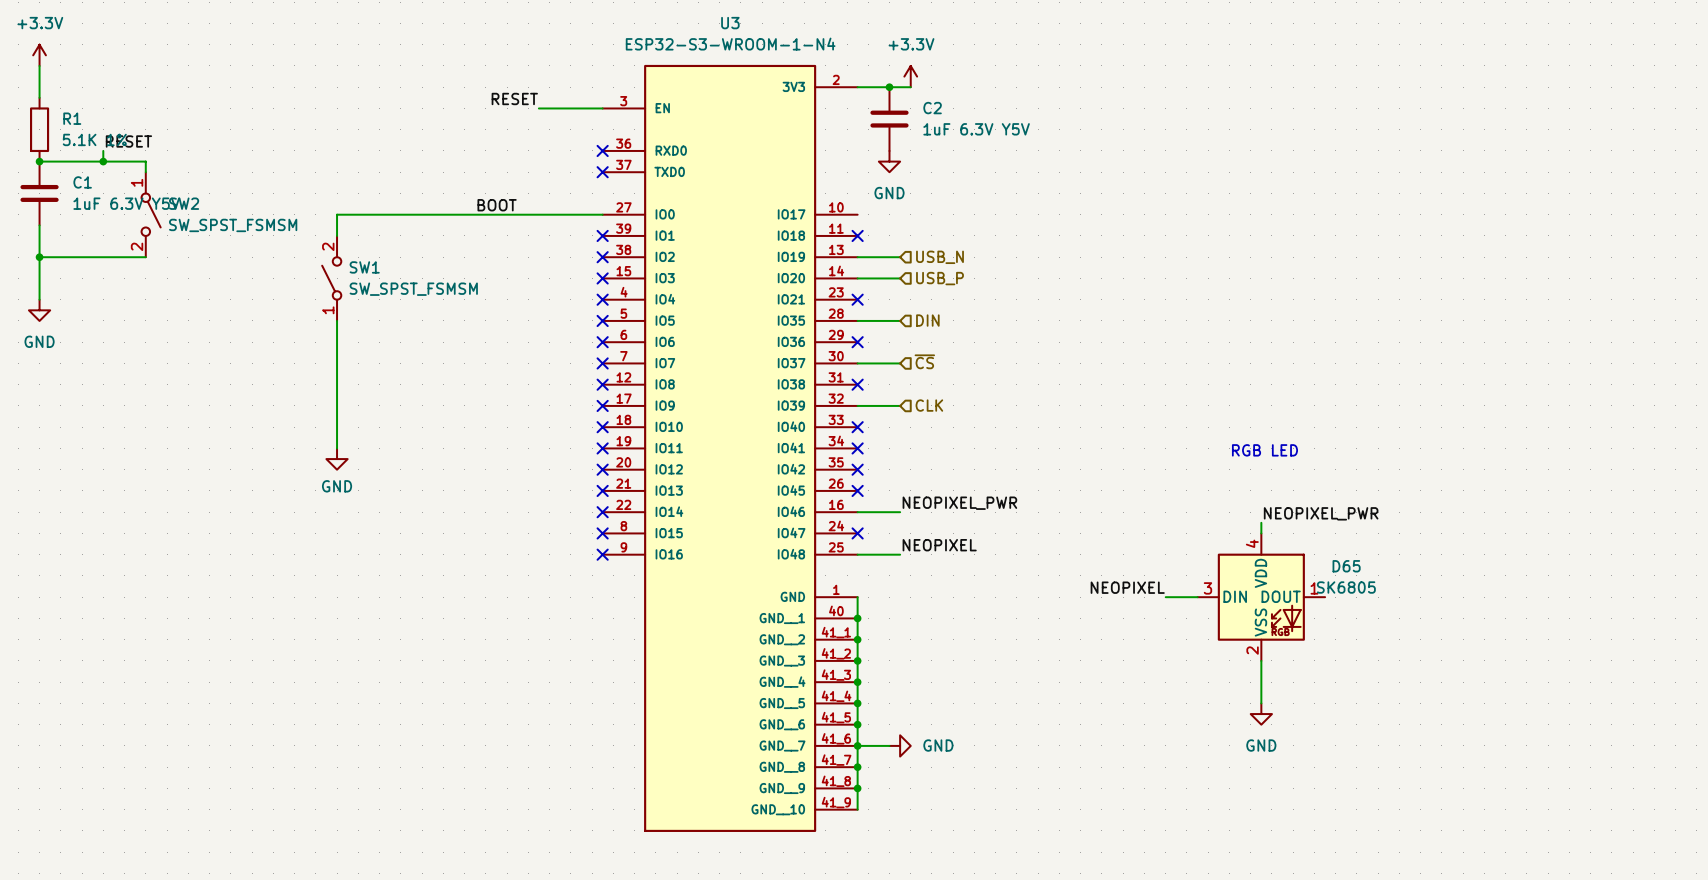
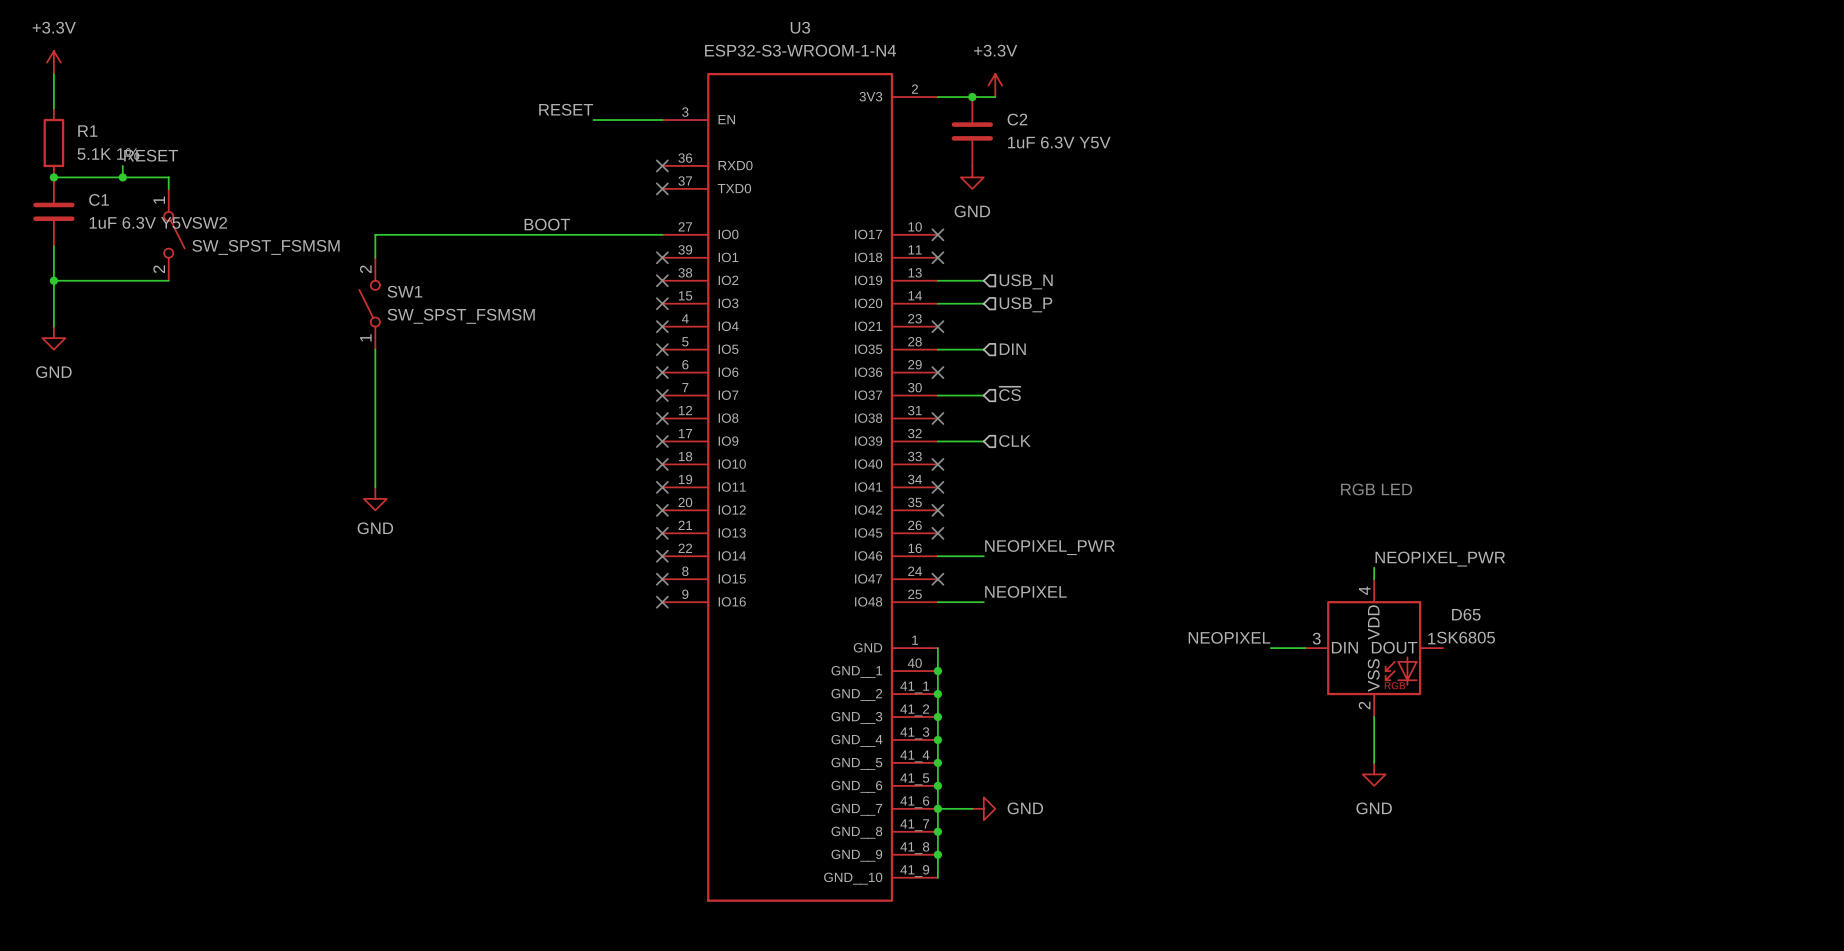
no-connect mark: none -> (937, 234)

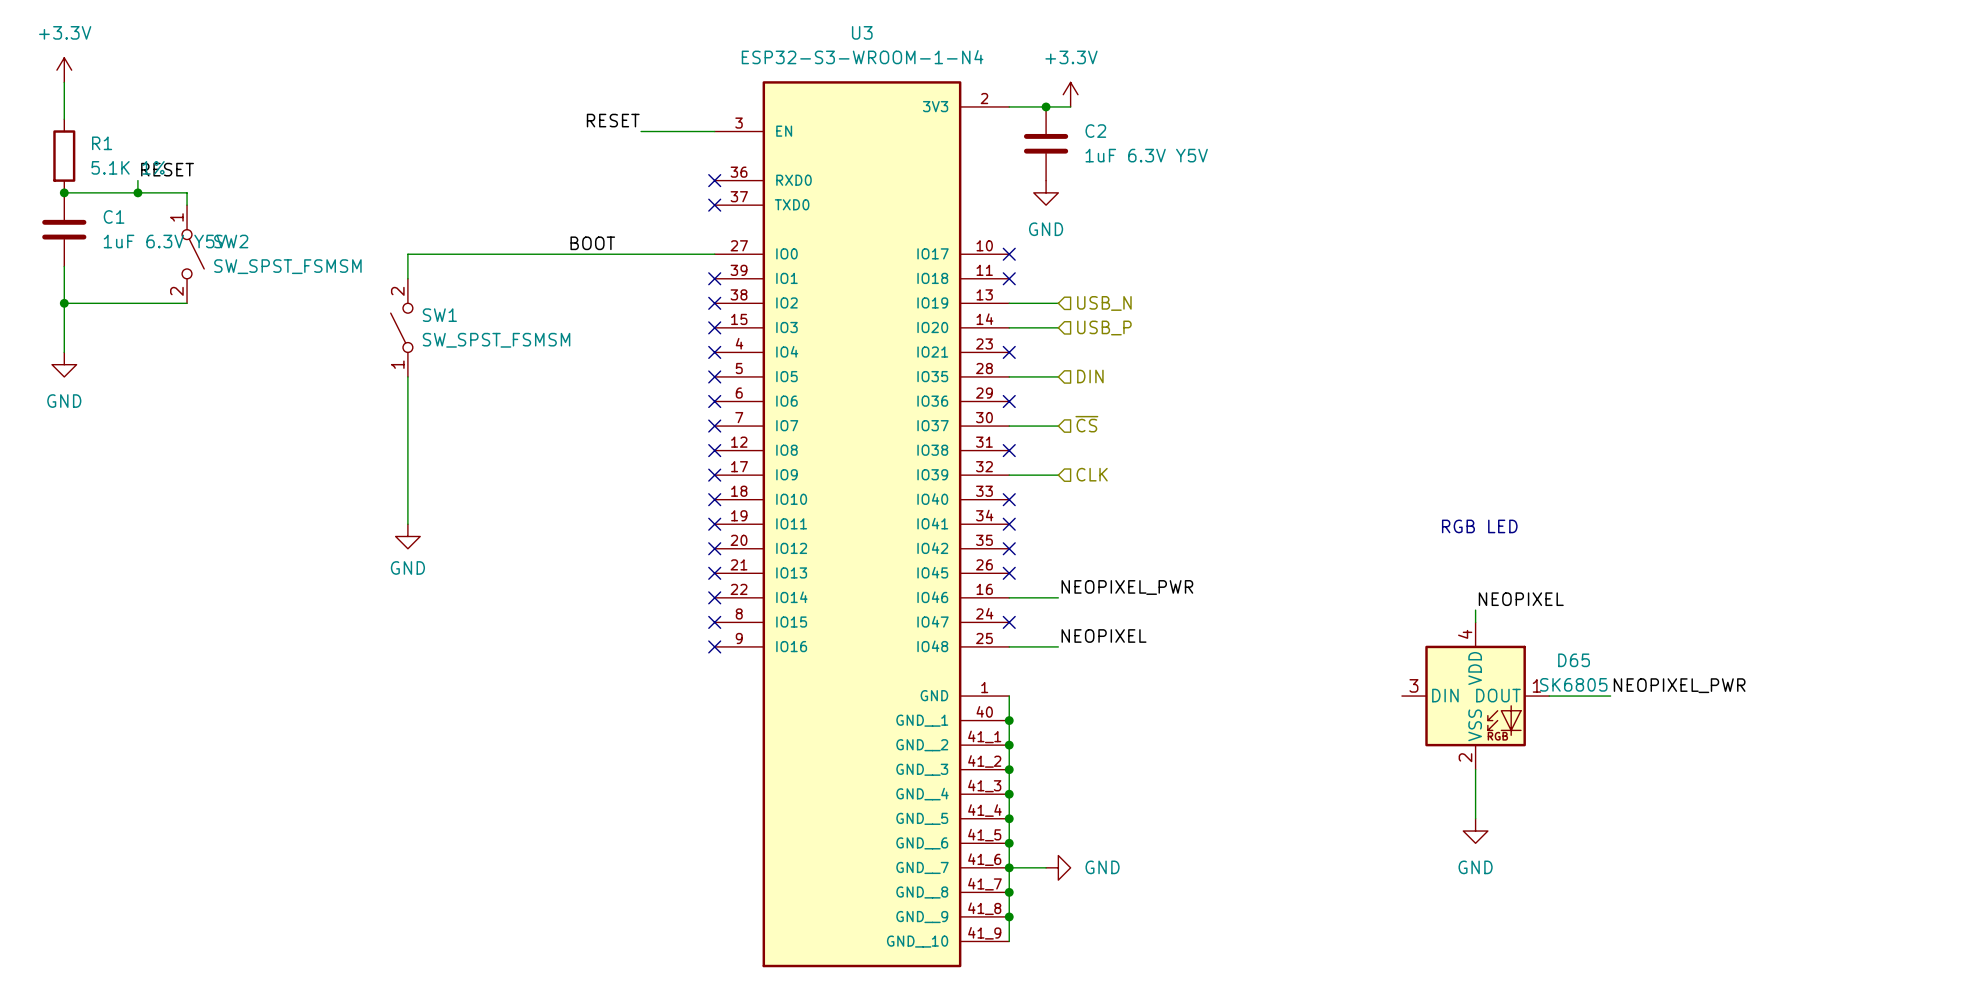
label: NEOPIXEL_PWR (1440, 559) -> NEOPIXEL (1521, 599)
label: NEOPIXEL (1229, 637) -> none
label: none -> NEOPIXEL_PWR (1679, 685)
wire: (1270, 648) (1305, 648) -> none
wire: none -> (1549, 696) (1610, 696)

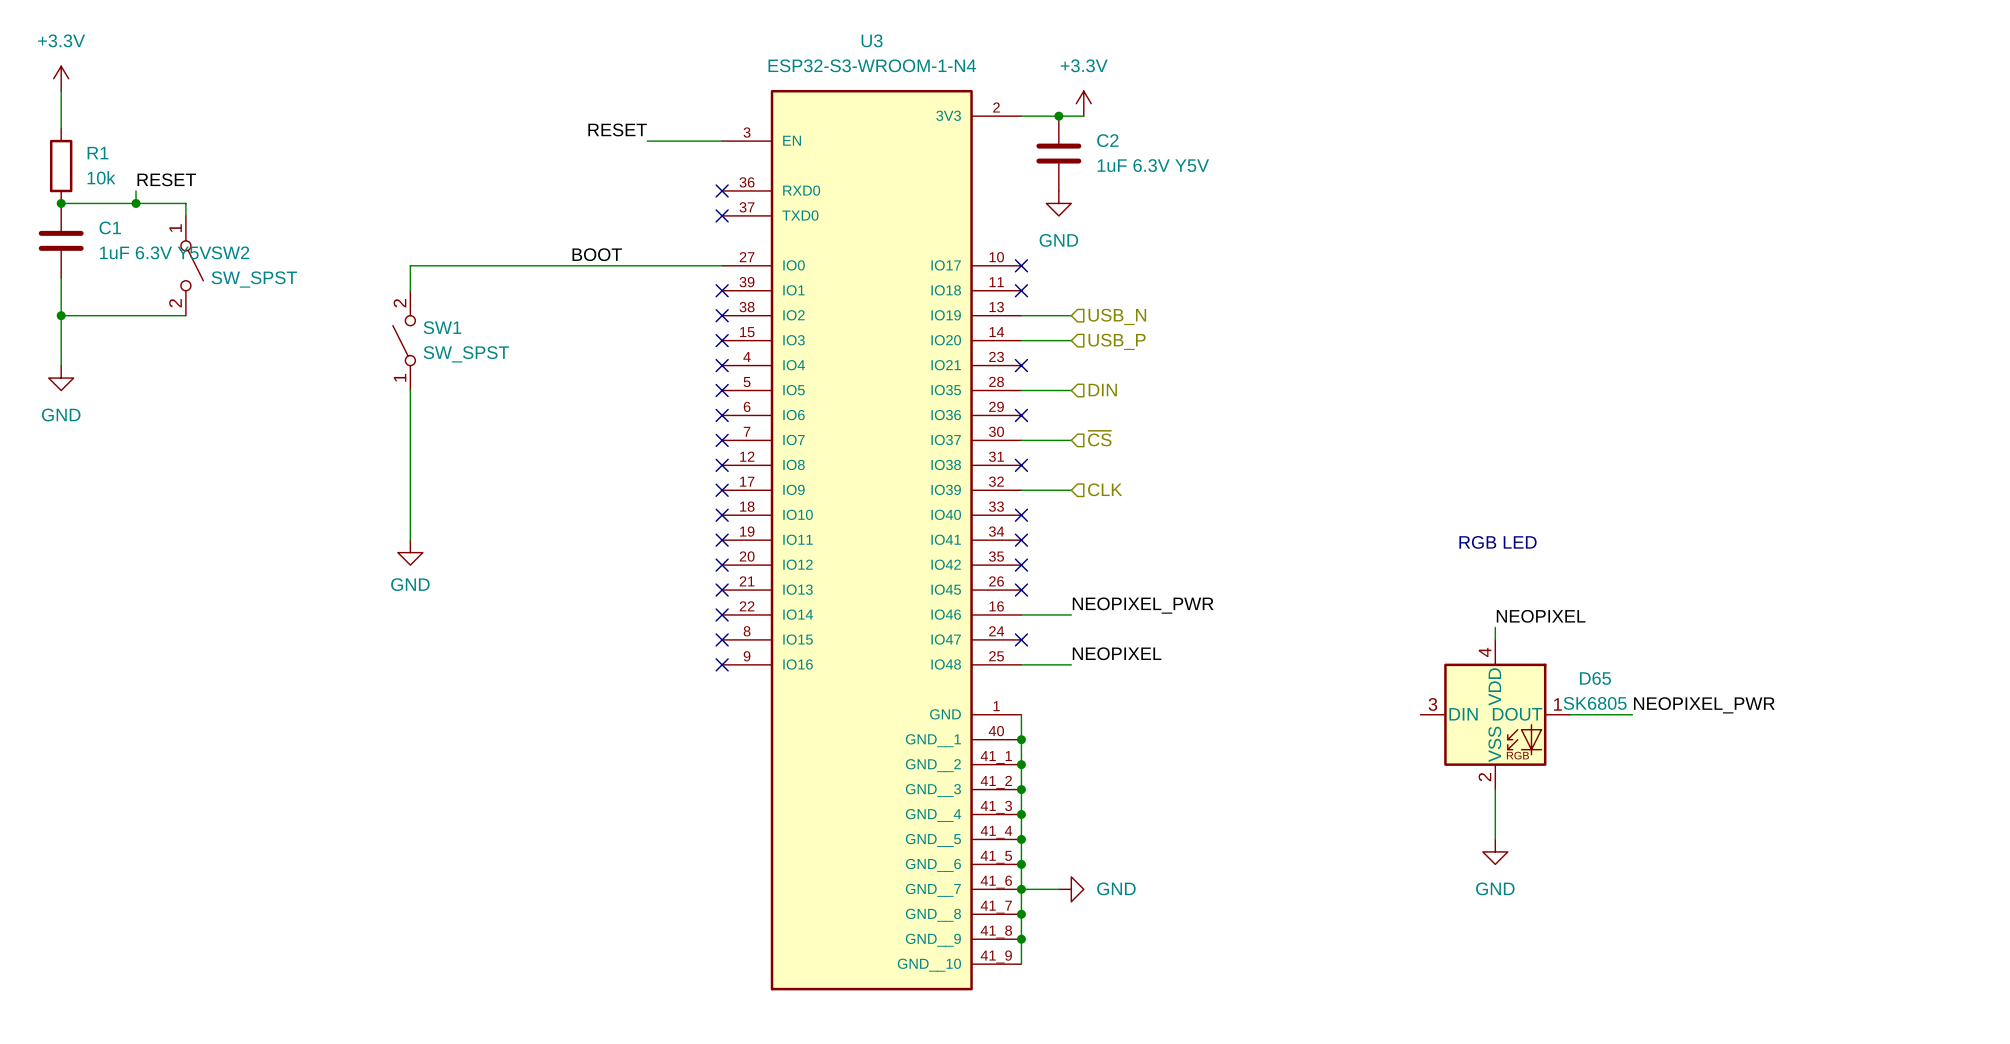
R1 value: 5.1K 1% (128, 167) -> 10k (101, 177)
SW2 value: SW_SPST_FSMSM (287, 266) -> SW_SPST (254, 279)
SW1 value: SW_SPST_FSMSM (496, 340) -> SW_SPST (466, 354)

